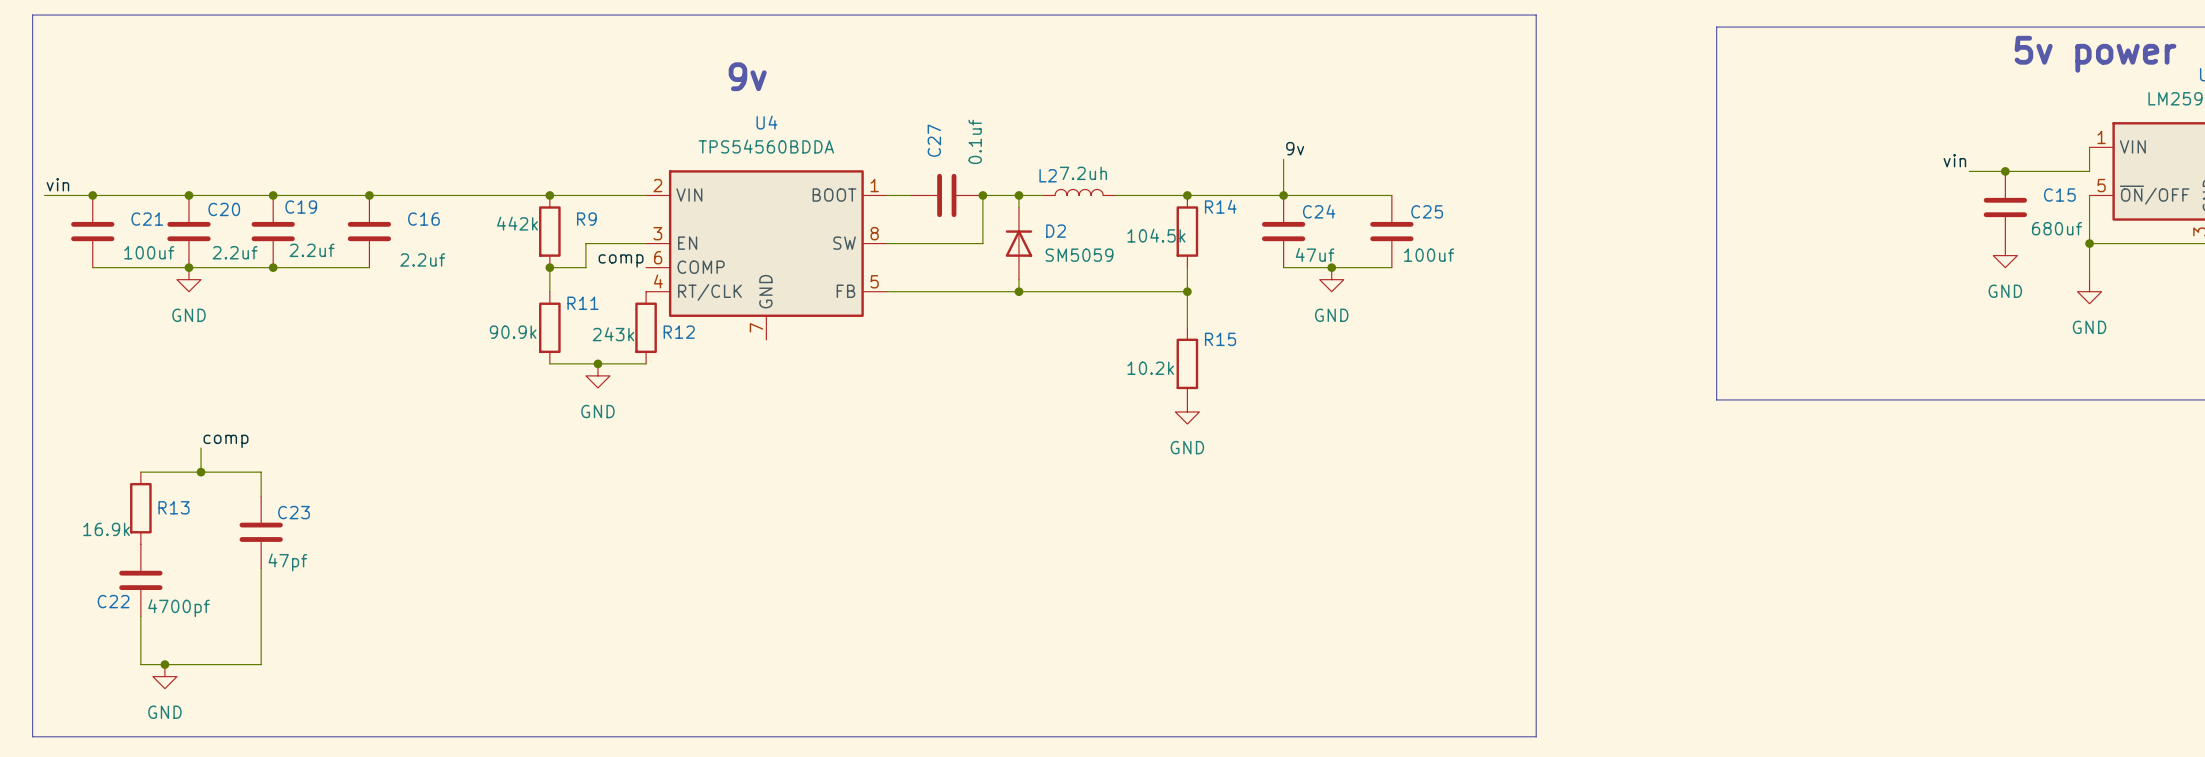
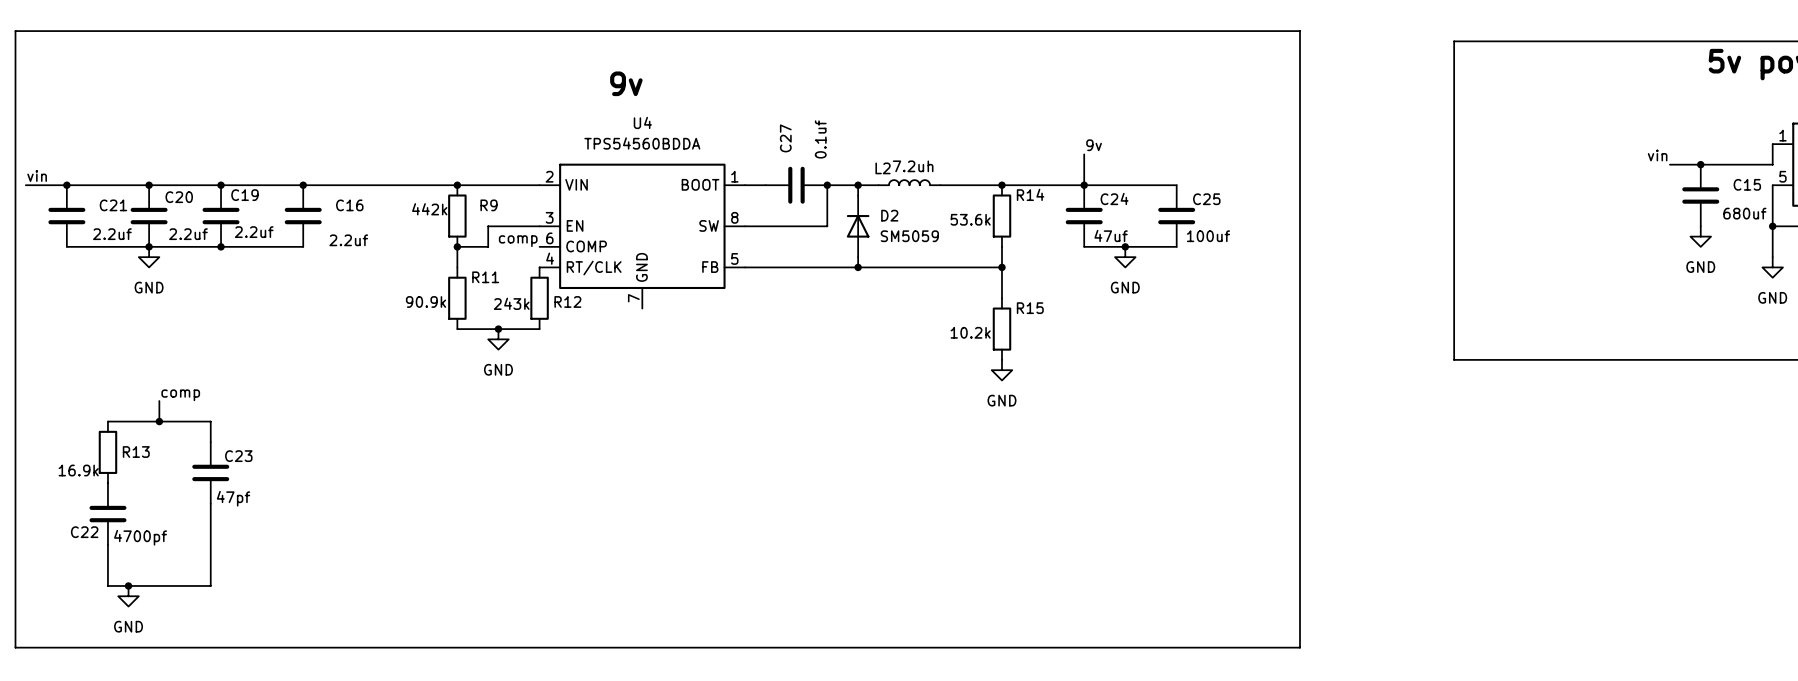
R14 value: 104.5k (1156, 235) -> 53.6k (970, 219)
C21 value: 100uf (149, 252) -> 2.2uf (112, 234)

